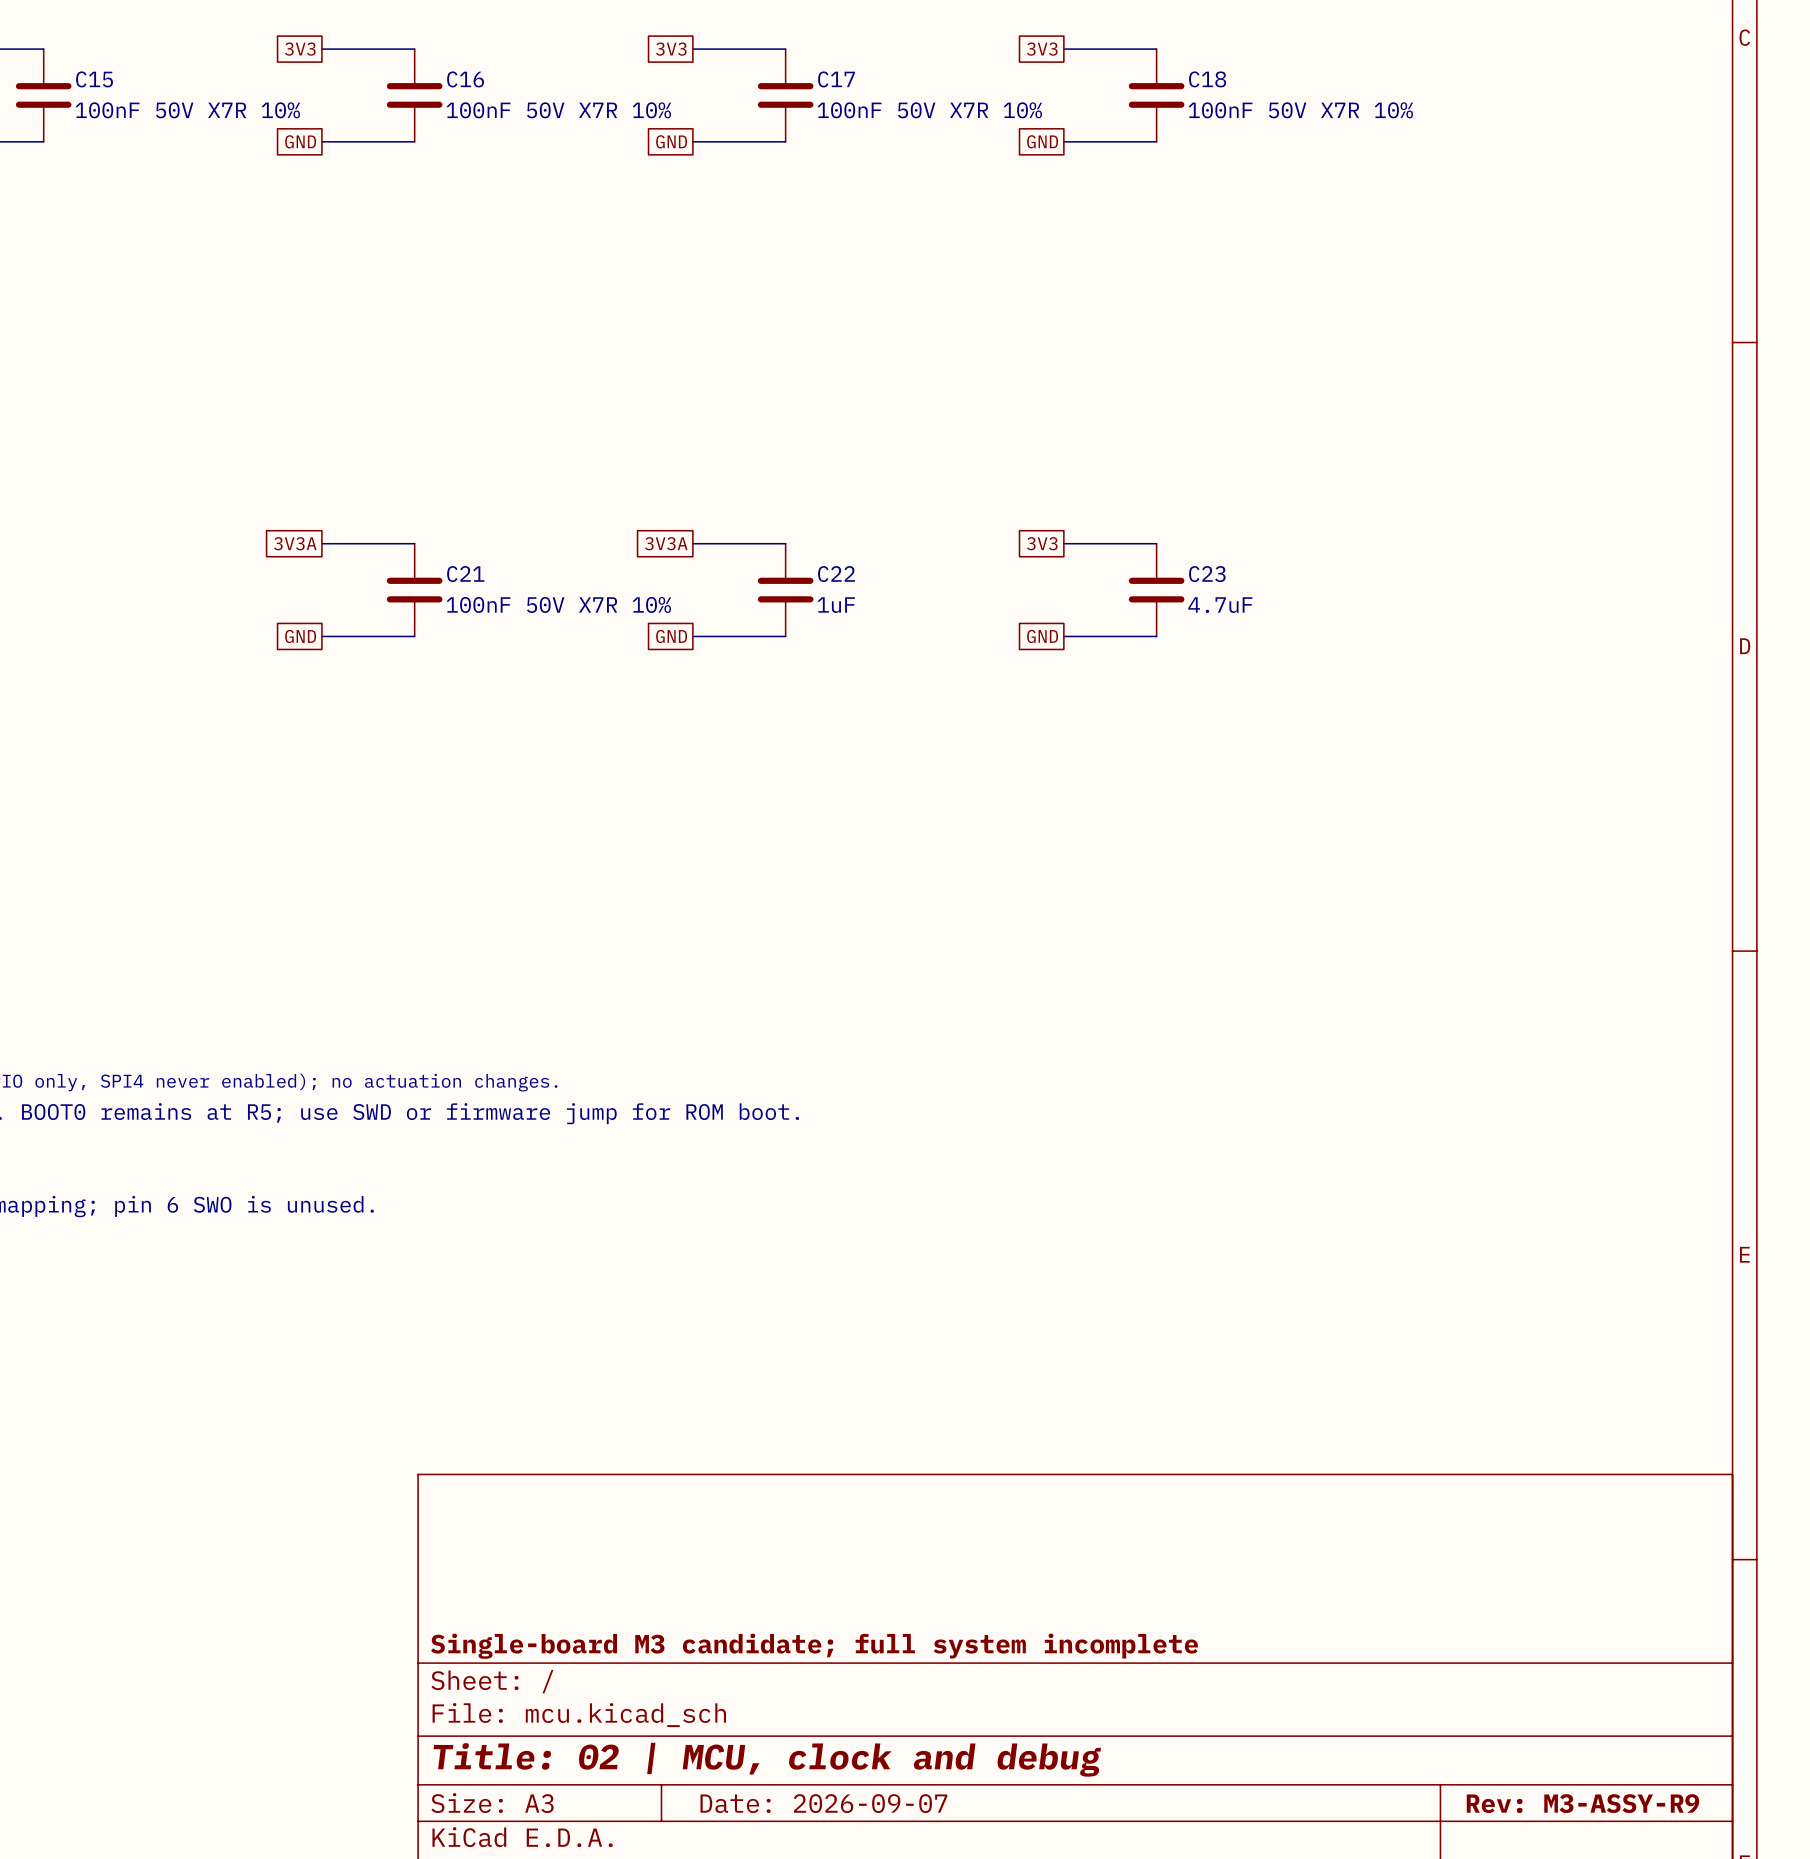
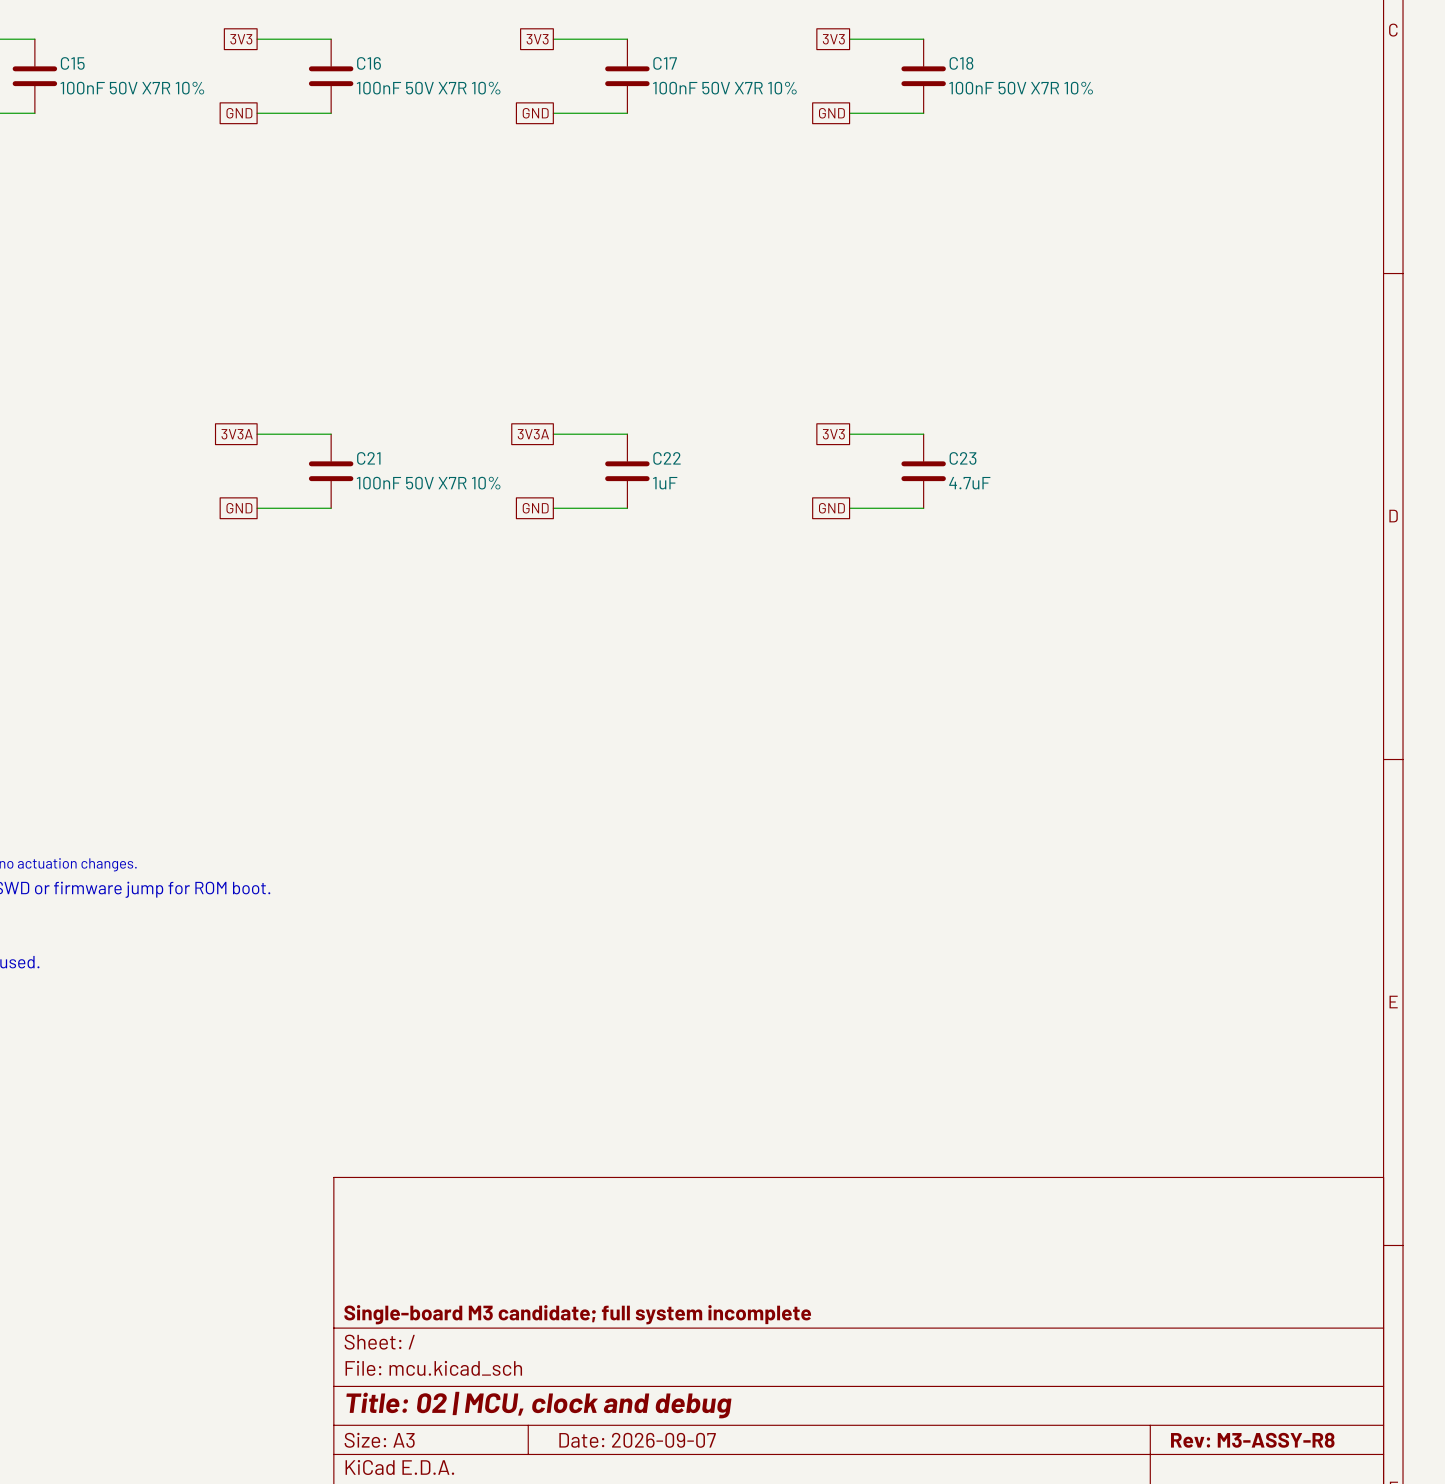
title block: Rev: M3-ASSY-R9 (1582, 1803) -> Rev: M3-ASSY-R8 (1252, 1440)

